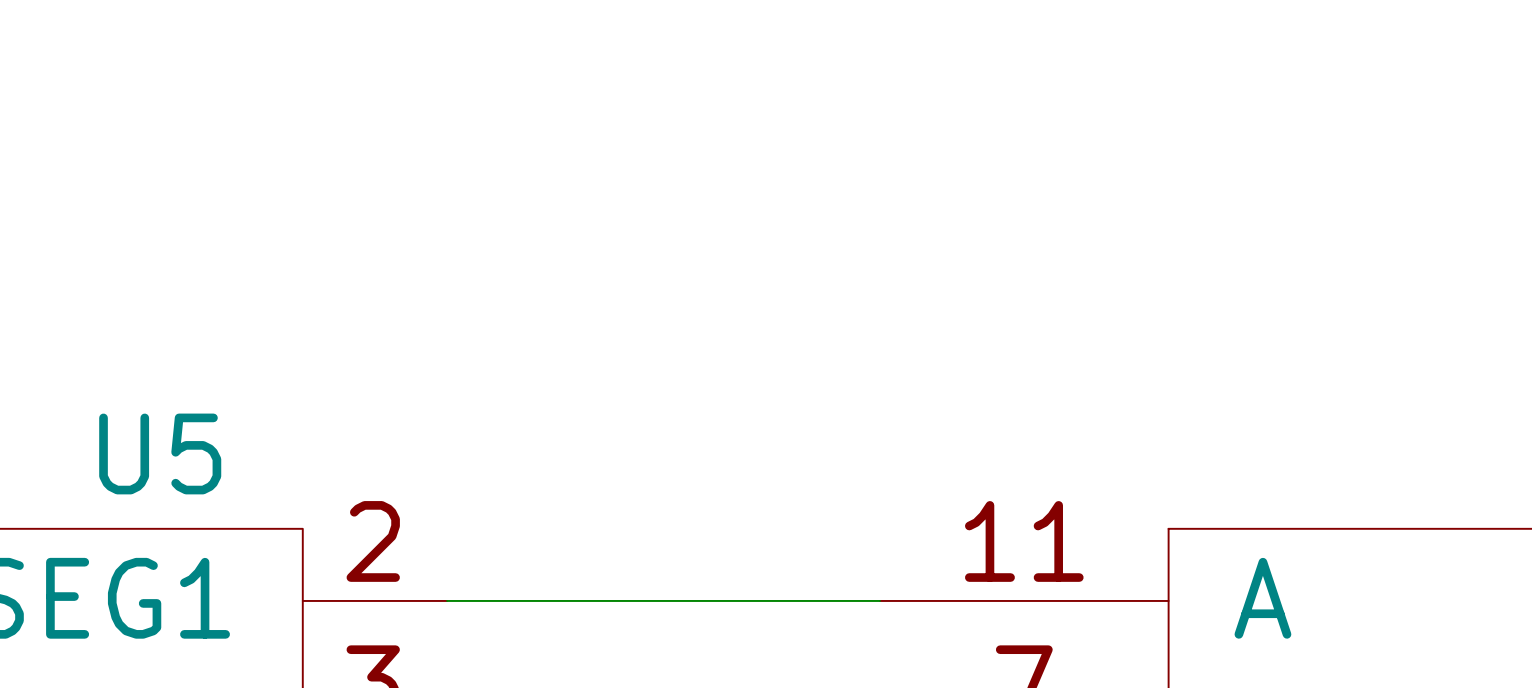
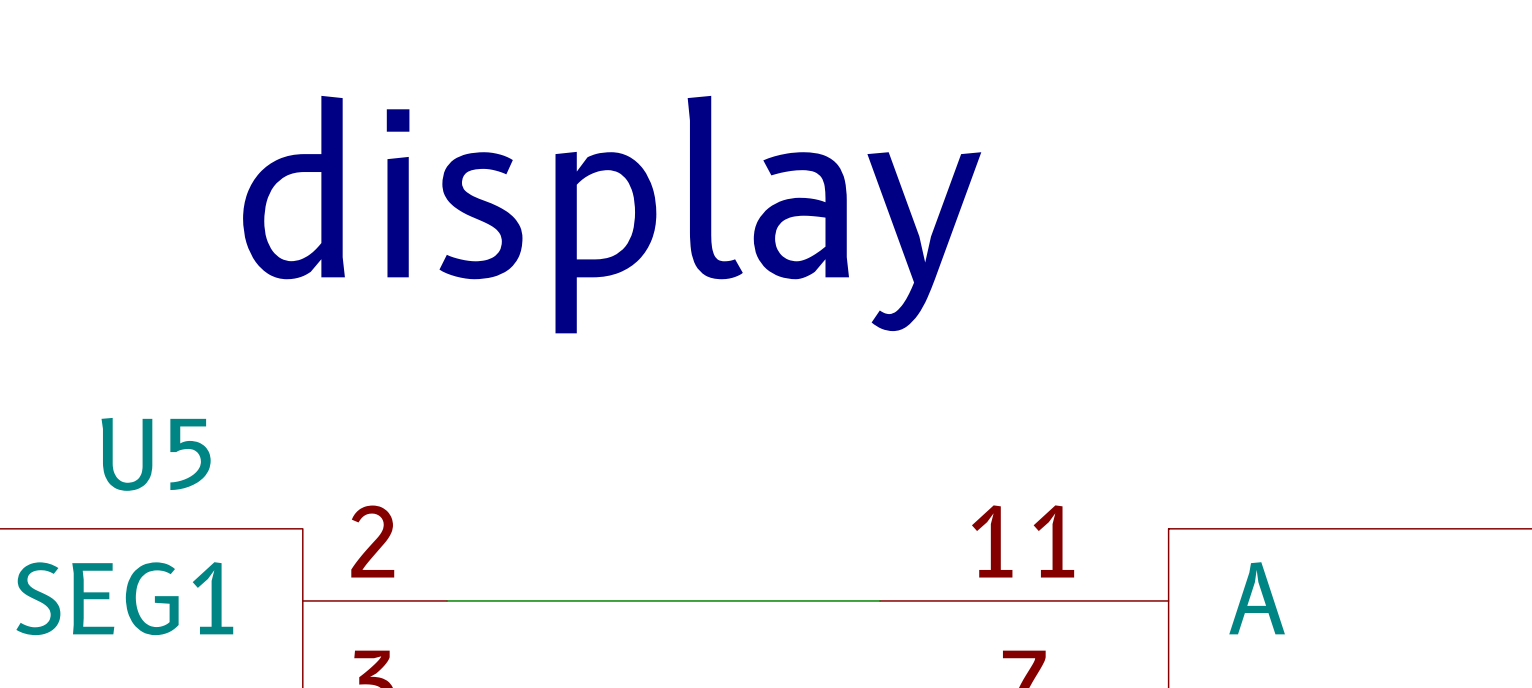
text: none -> display (612, 214)

